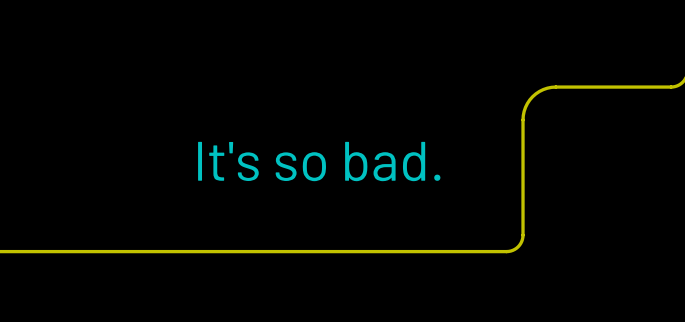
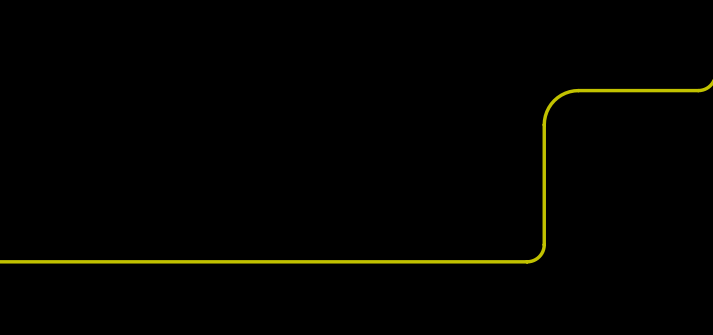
text: It's so bad. (319, 161) -> none

